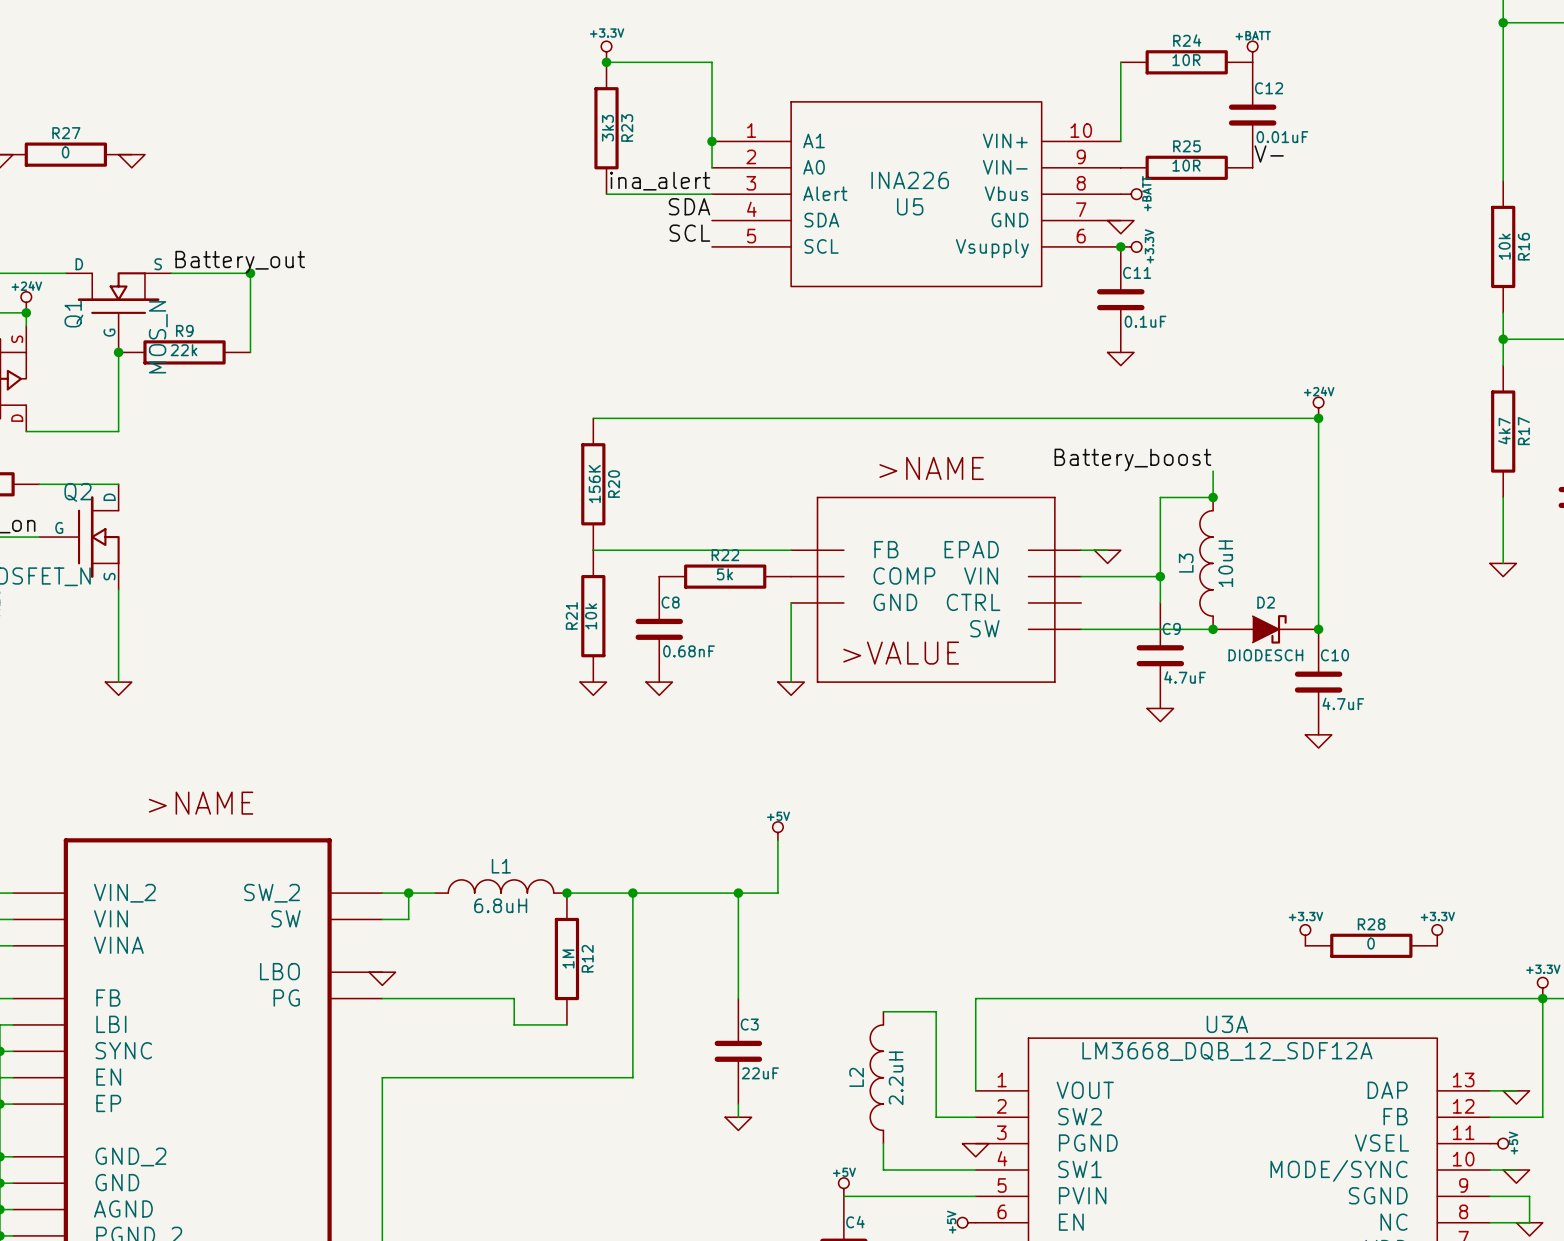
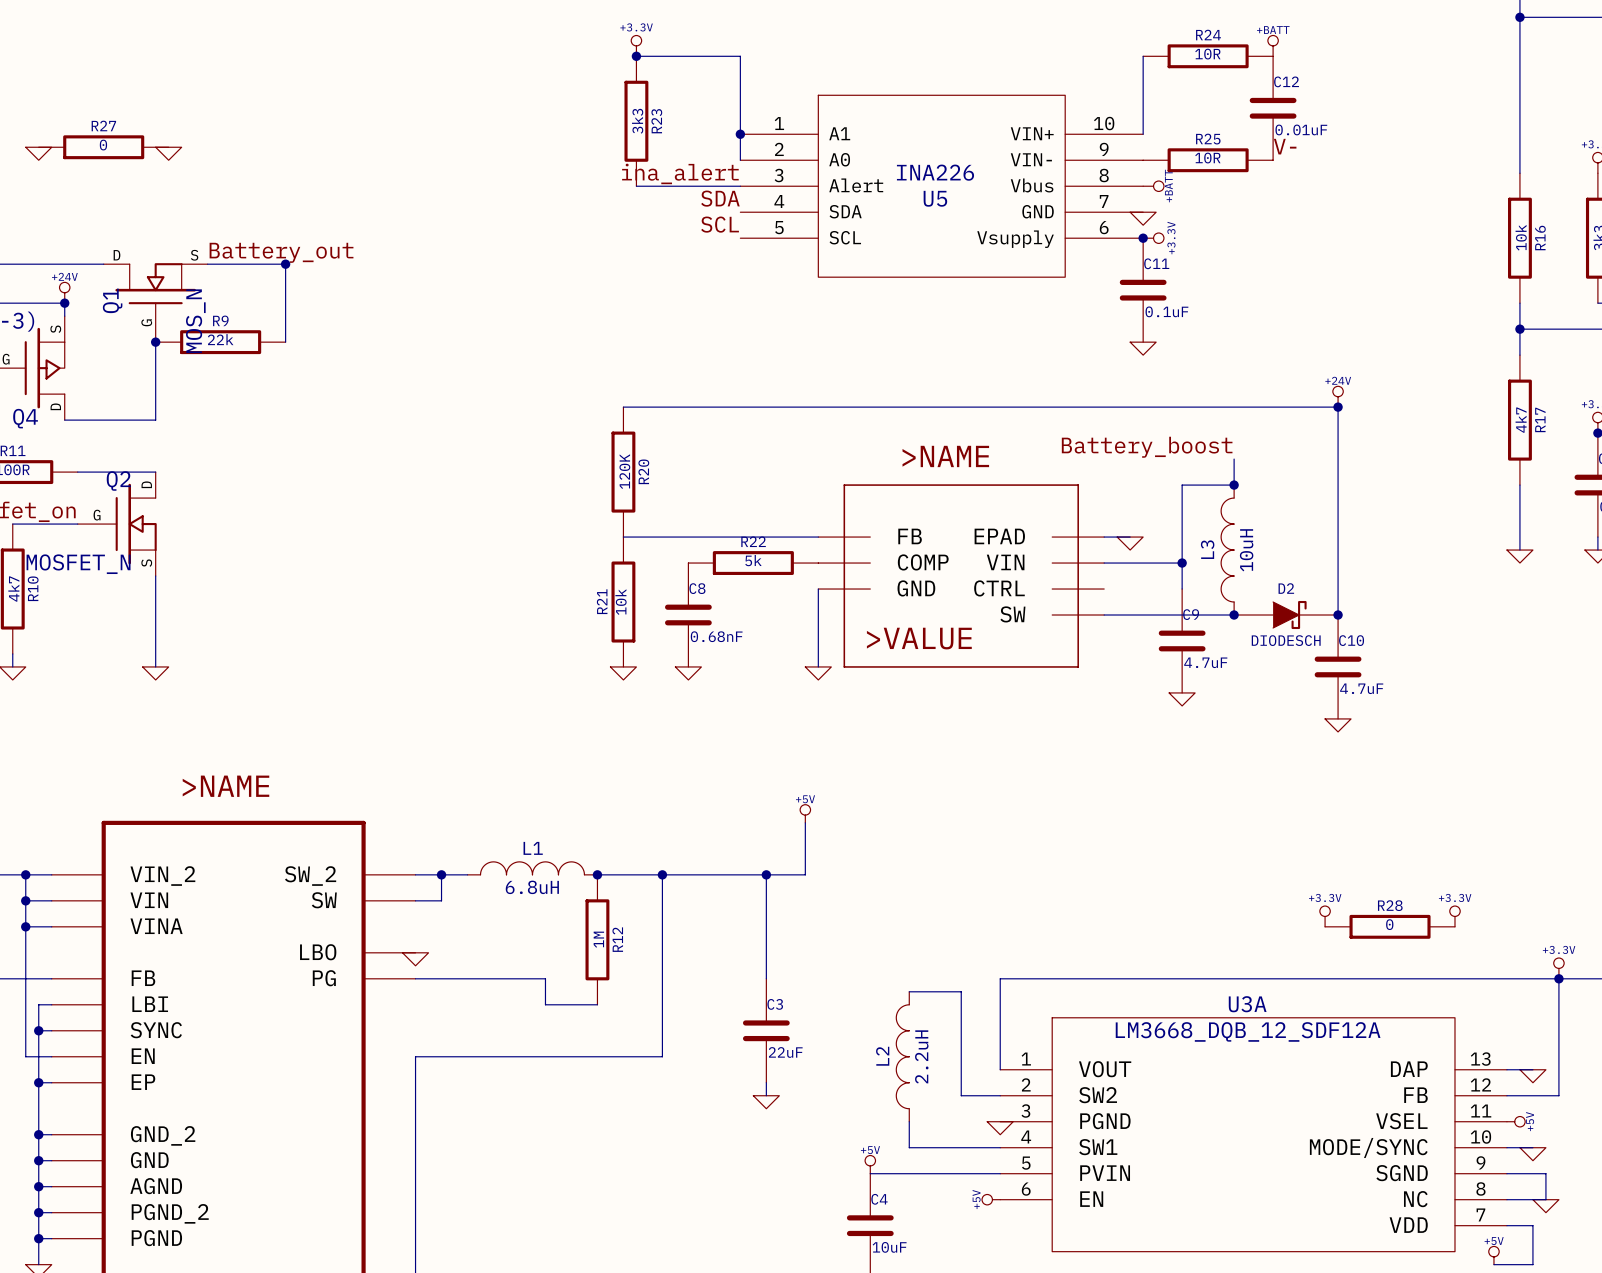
R20 value: 156K (594, 484) -> 120K (624, 471)

